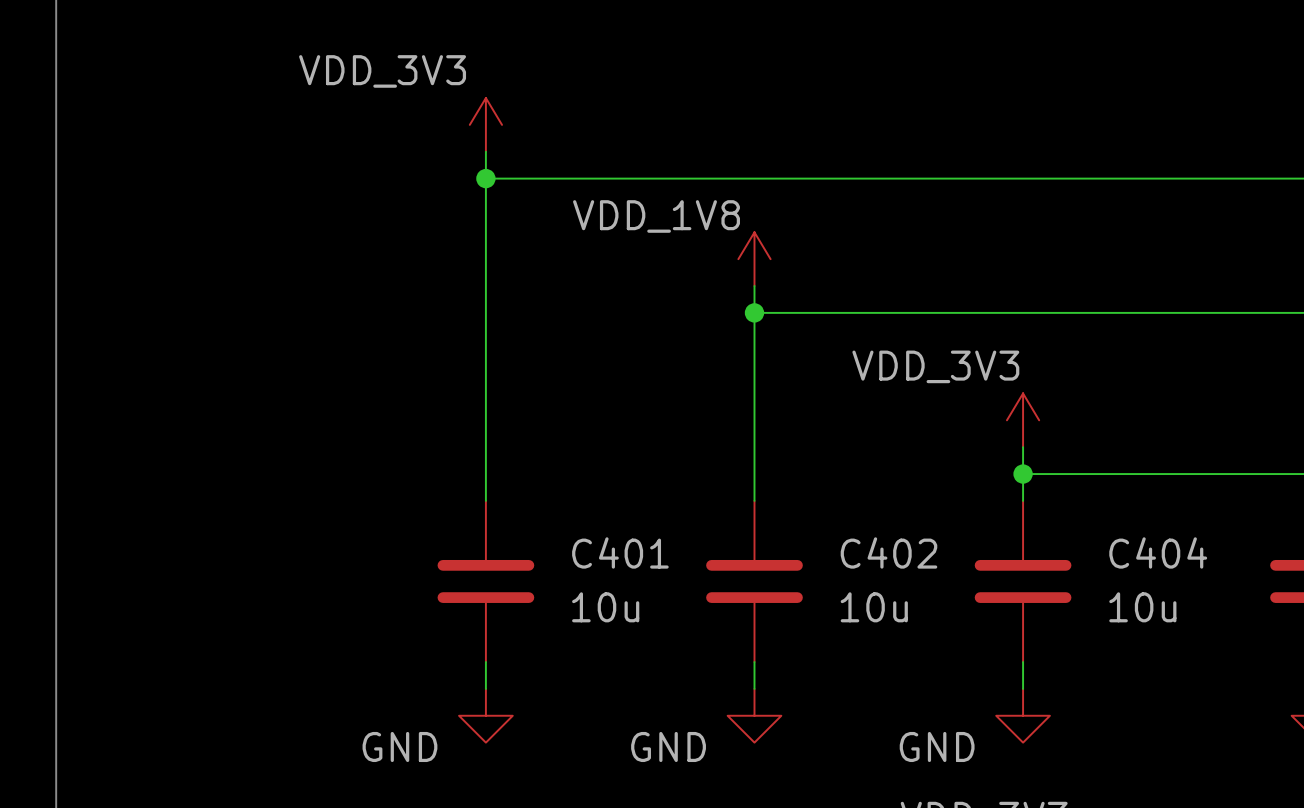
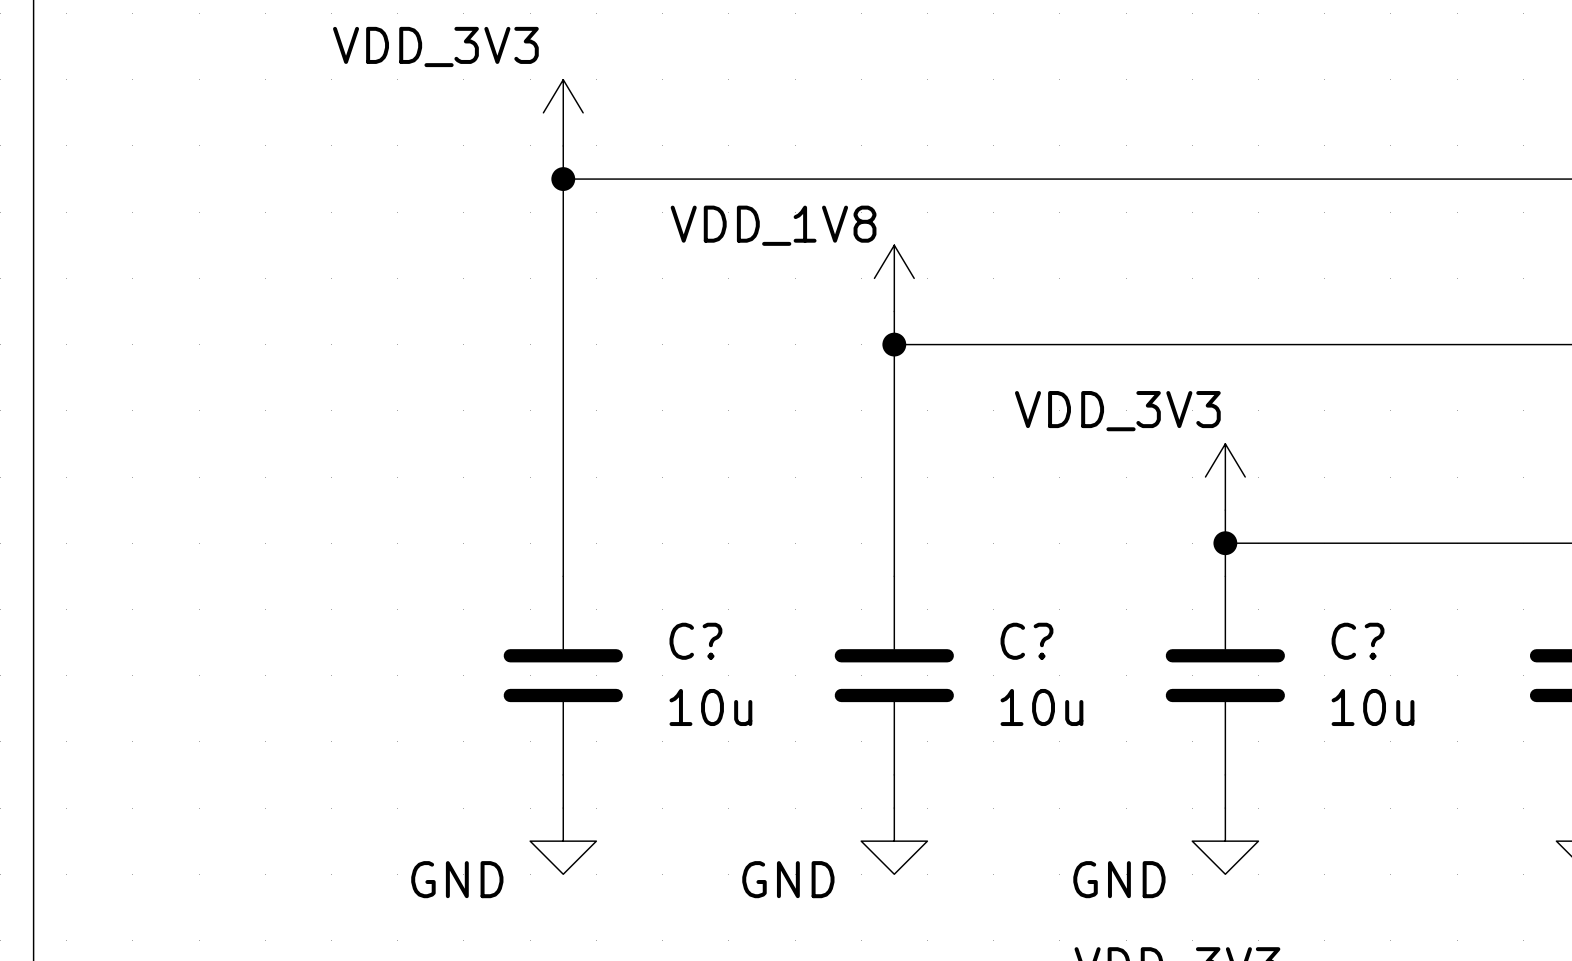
C401 name: C401 (620, 552) -> C? (695, 641)
C402 name: C402 (888, 552) -> C? (1026, 641)
C404 name: C404 (1158, 552) -> C? (1358, 641)

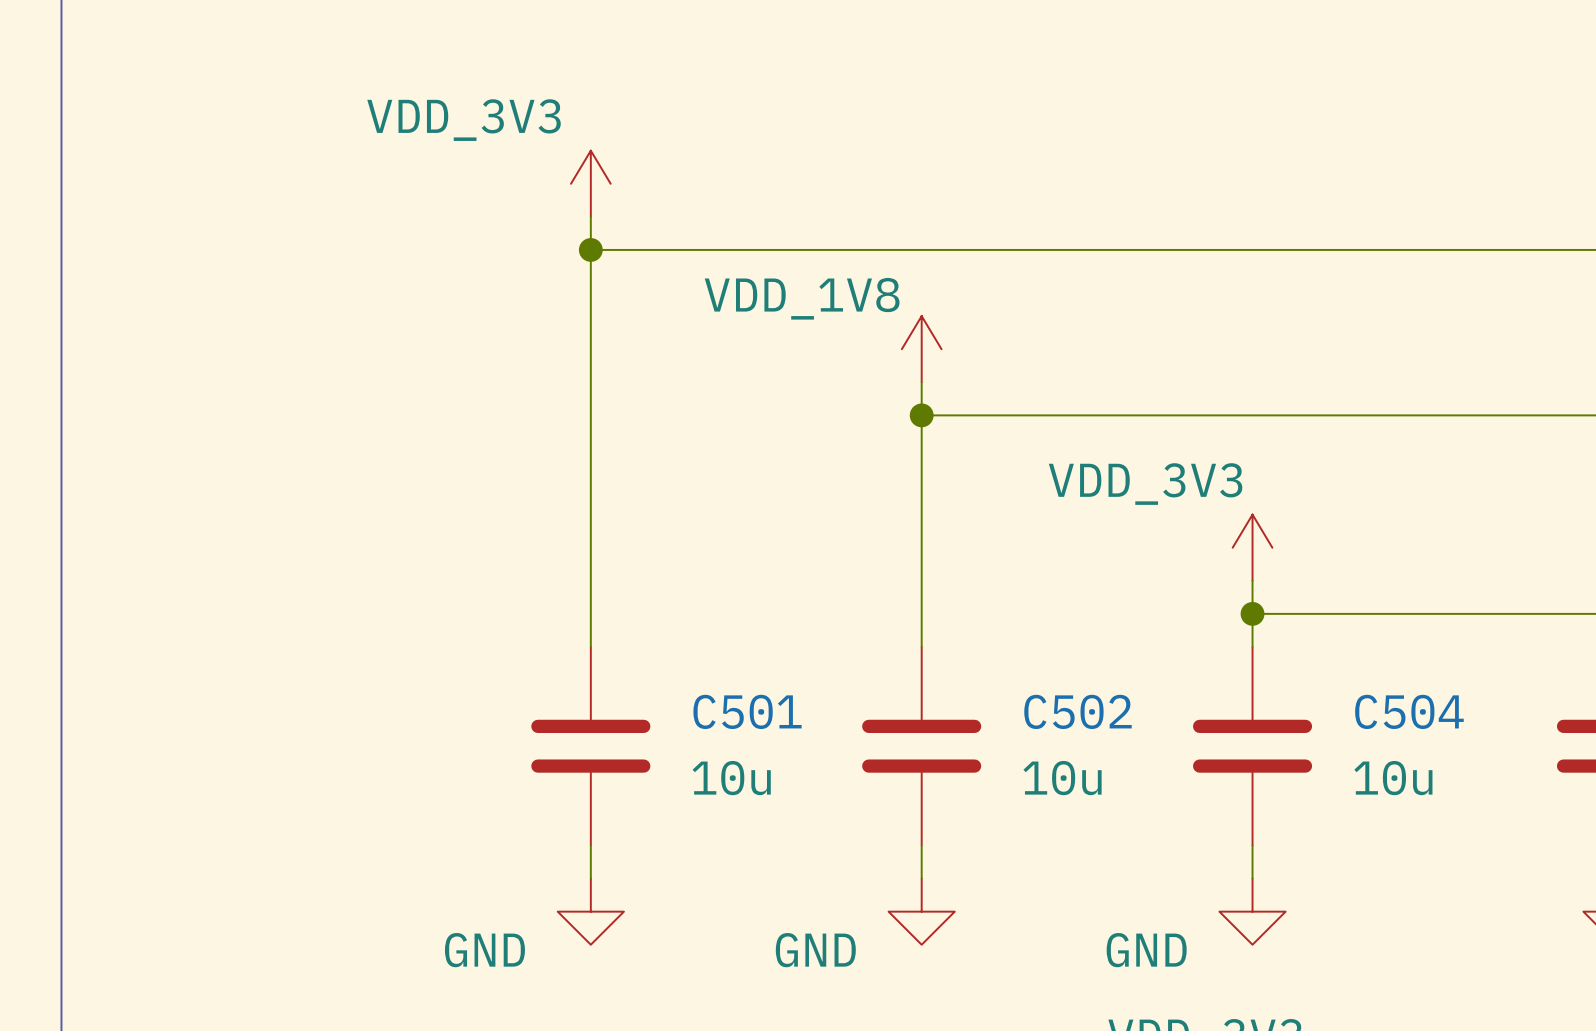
C? name: C? (695, 641) -> C501 (747, 711)
C? name: C? (1026, 641) -> C502 (1077, 711)
C? name: C? (1358, 641) -> C504 (1409, 711)

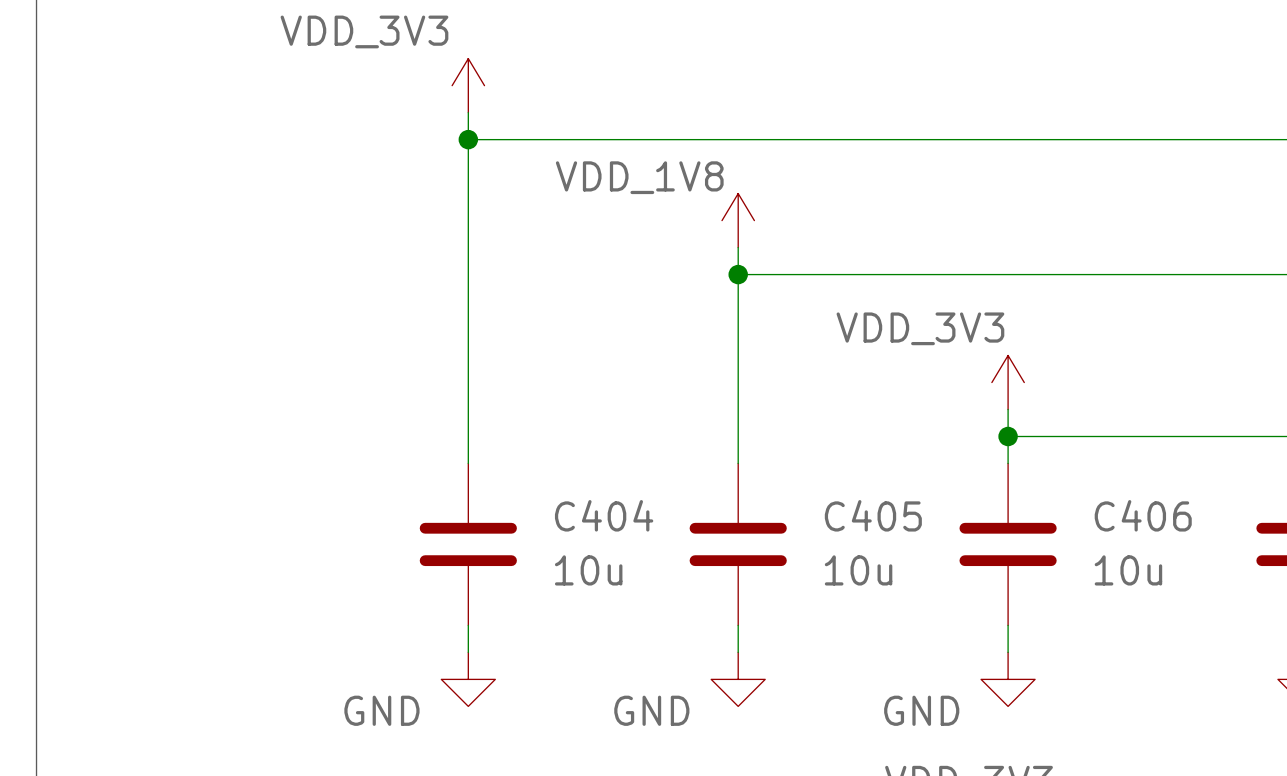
C501 name: C501 (747, 711) -> C404 (604, 515)
C502 name: C502 (1077, 711) -> C405 (873, 515)
C504 name: C504 (1409, 711) -> C406 (1143, 515)

